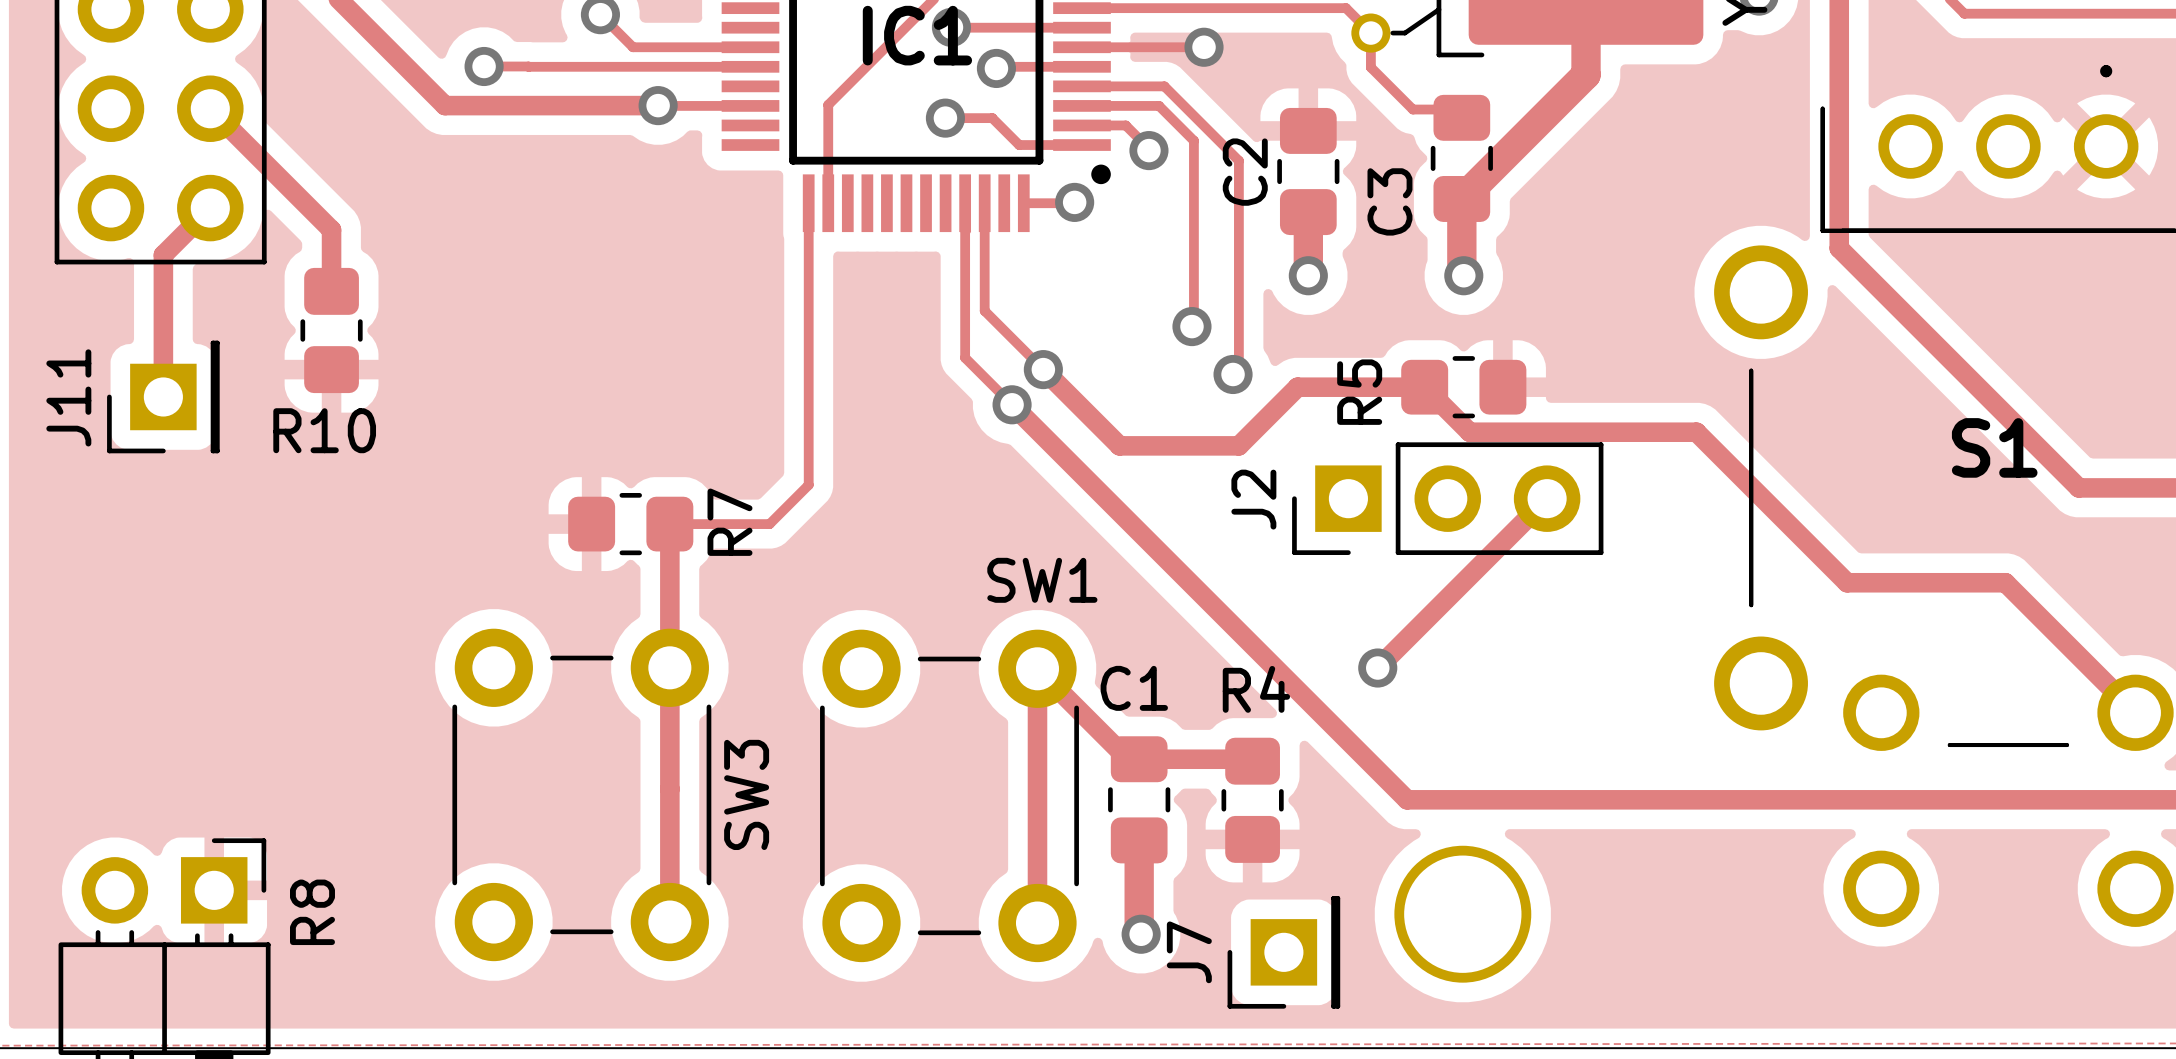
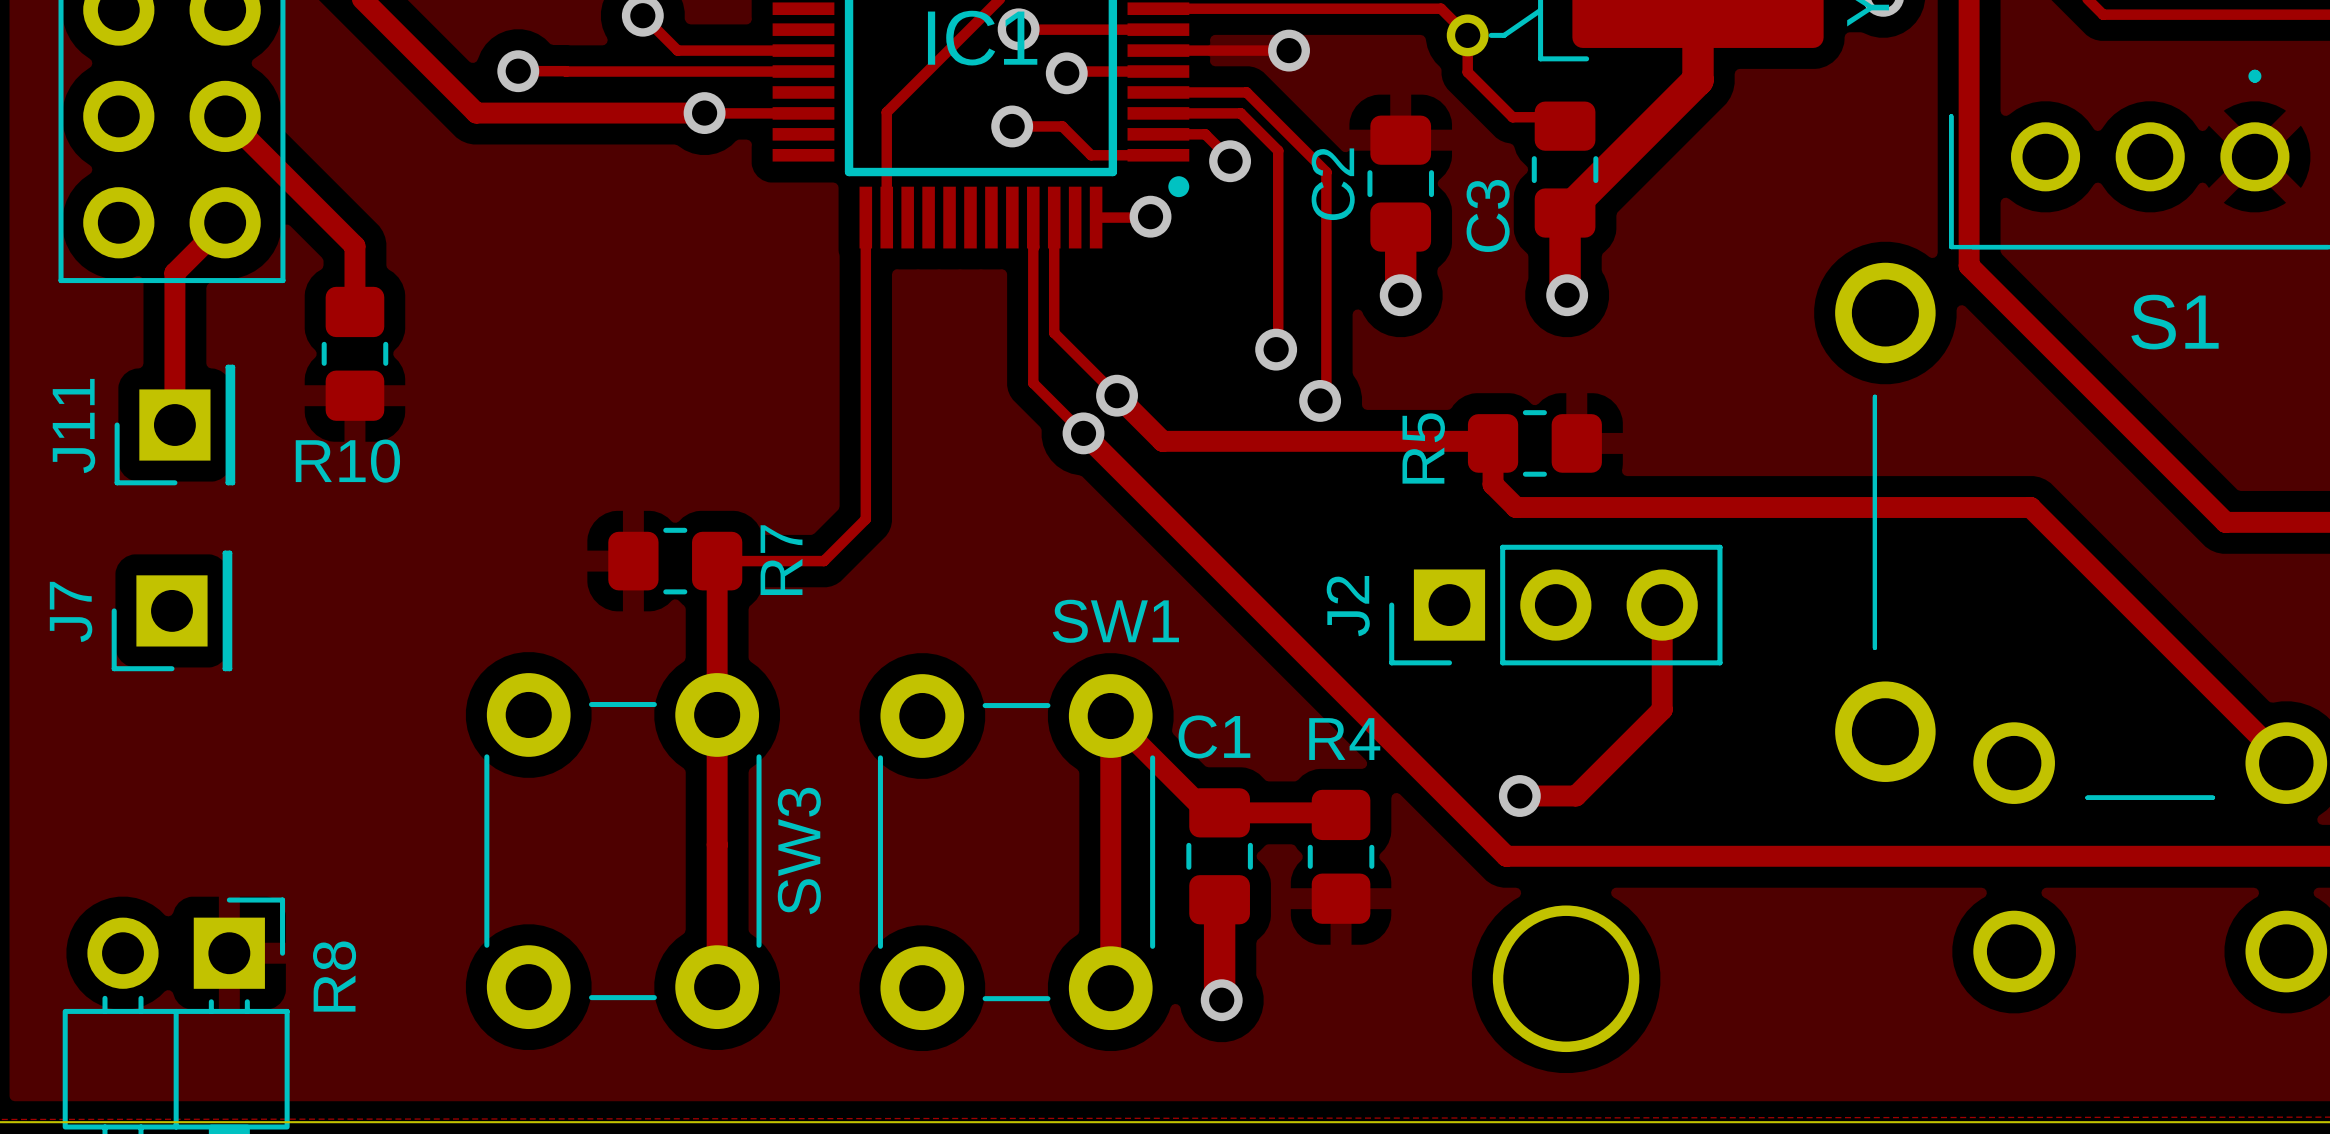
R5 position: (1463, 387) -> (1534, 443)
track: (1085, 412) (1119, 445) (1238, 445) (1297, 387) (1424, 387) (1469, 432) (1696, 432) (1847, 582) (2005, 582) -> (1162, 441) (1493, 441) (1493, 484) (1516, 507) (2030, 507) (2147, 623)
S1 name position: S1 (1994, 447) -> S1 (2175, 322)
J2 position: (1447, 498) -> (1555, 605)
track: (1547, 498) (1377, 668) -> none
track: none -> (1662, 605) (1662, 709) (1575, 795) (1519, 795)
via position: (1377, 668) -> (1519, 795)
J7 position: (1283, 952) -> (171, 610)

